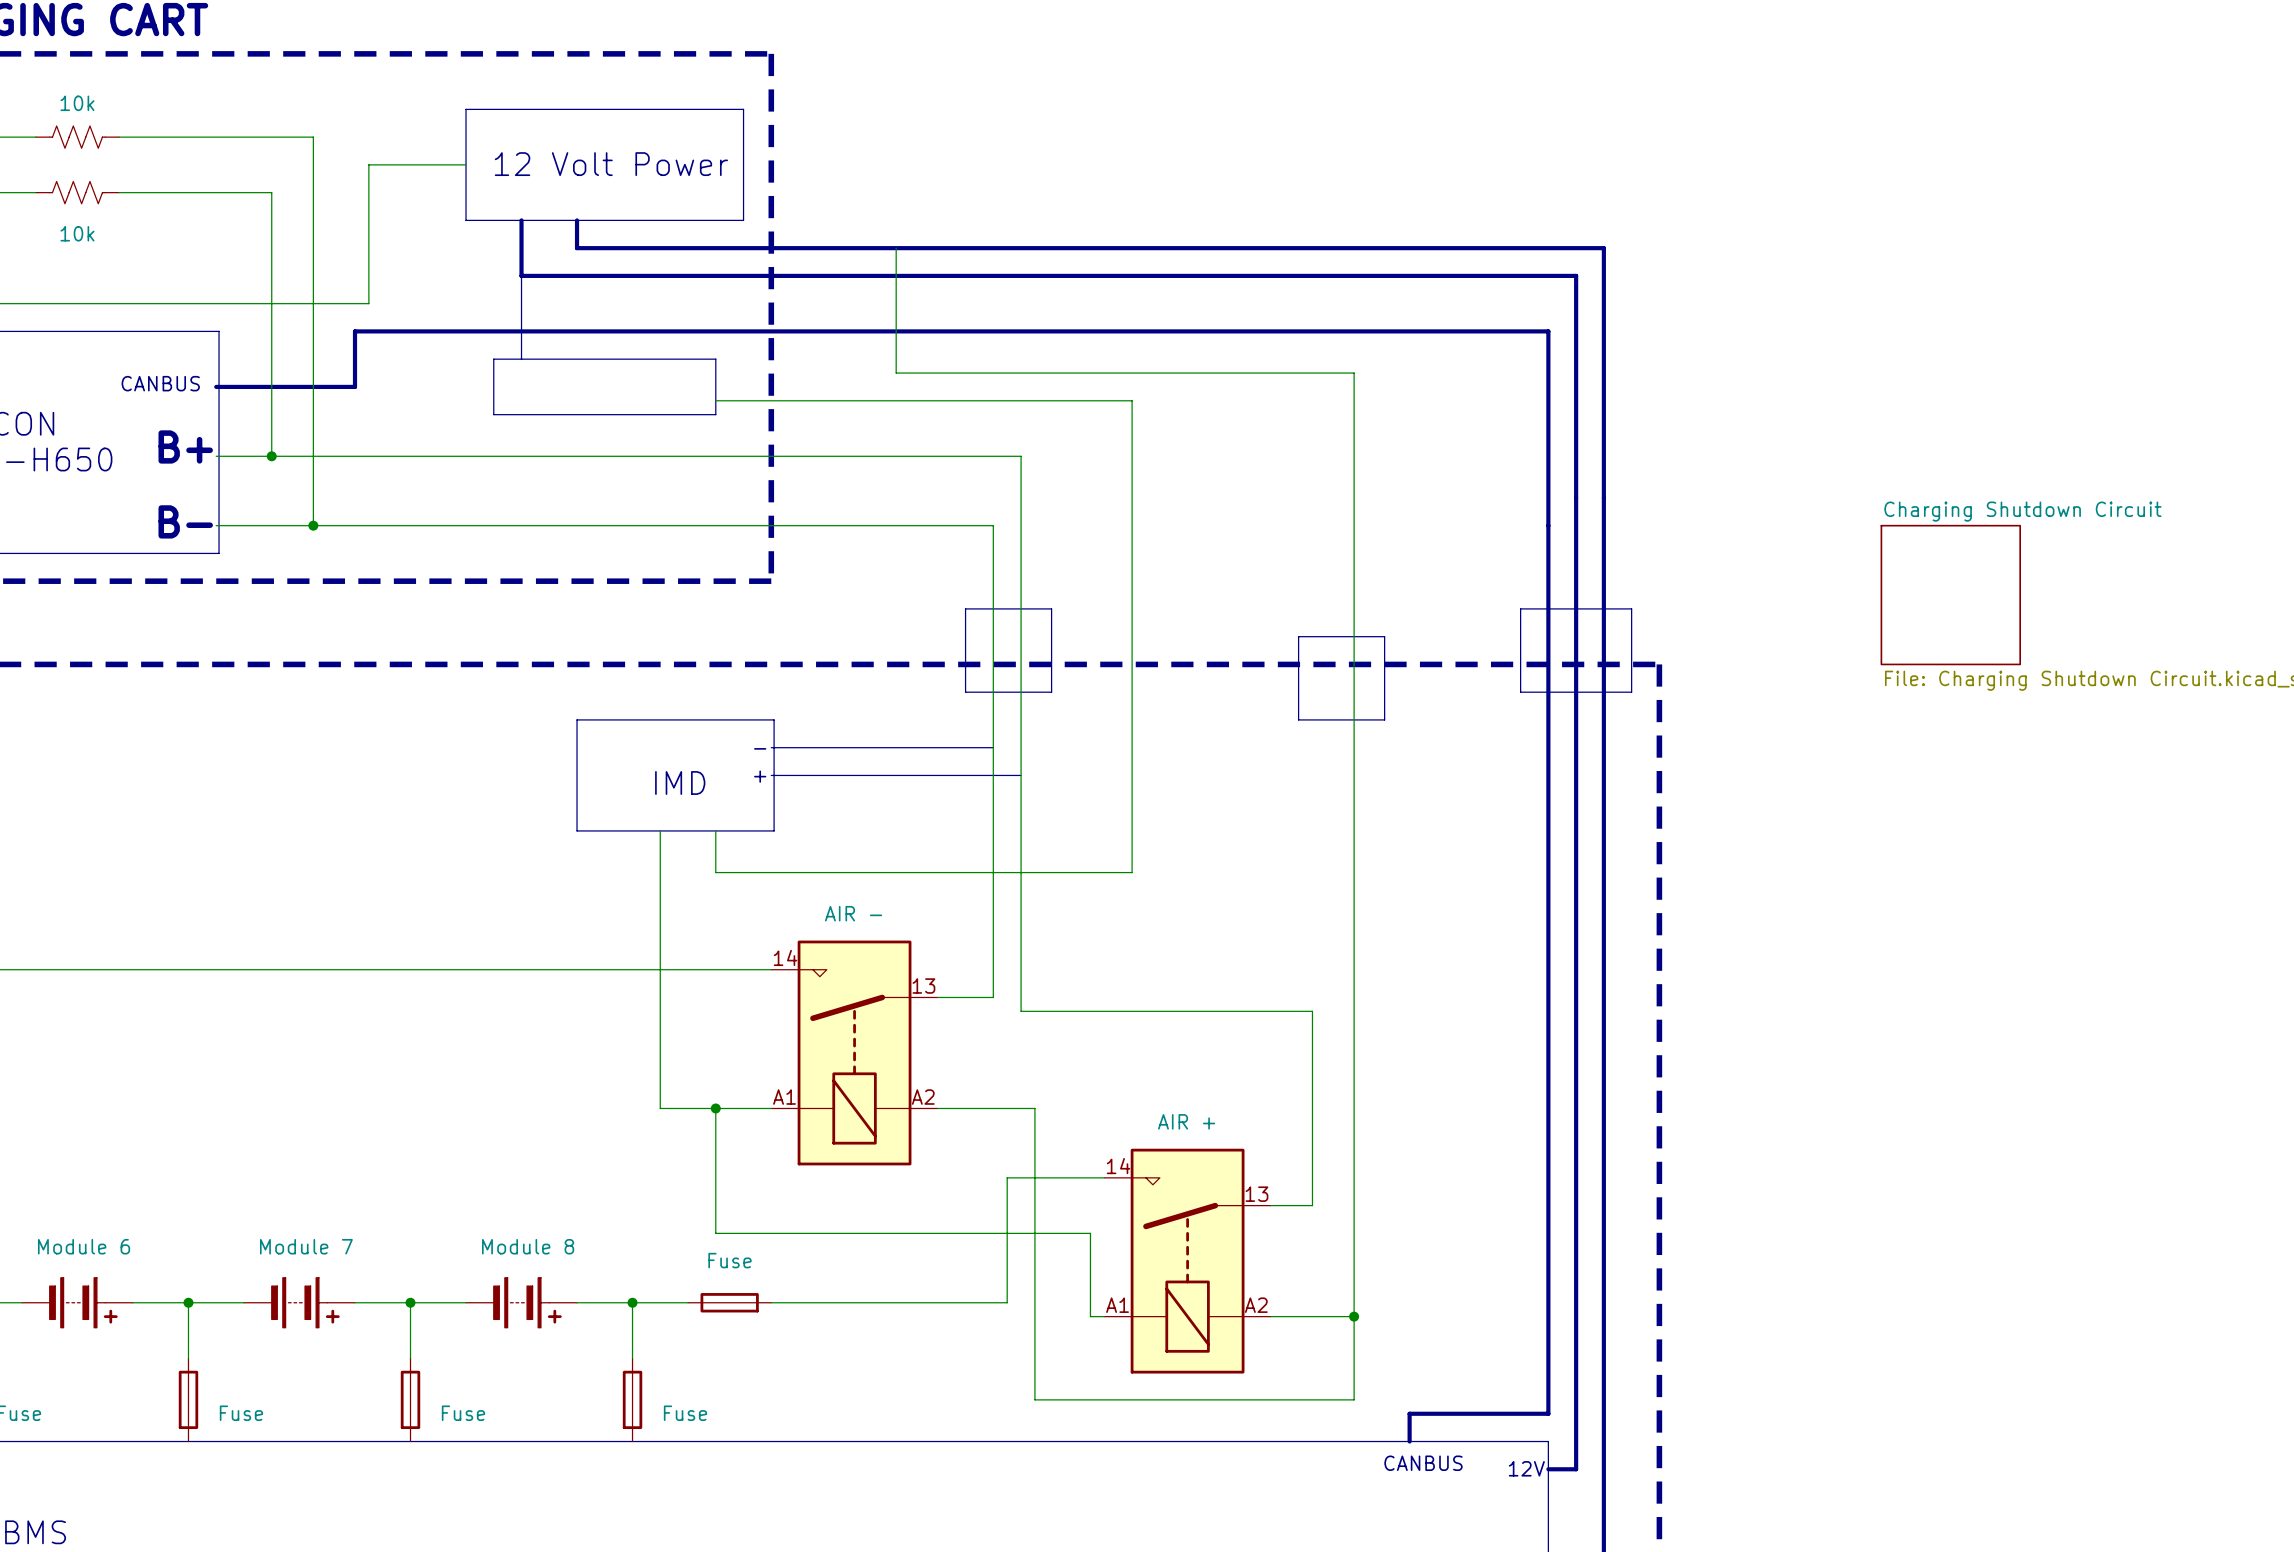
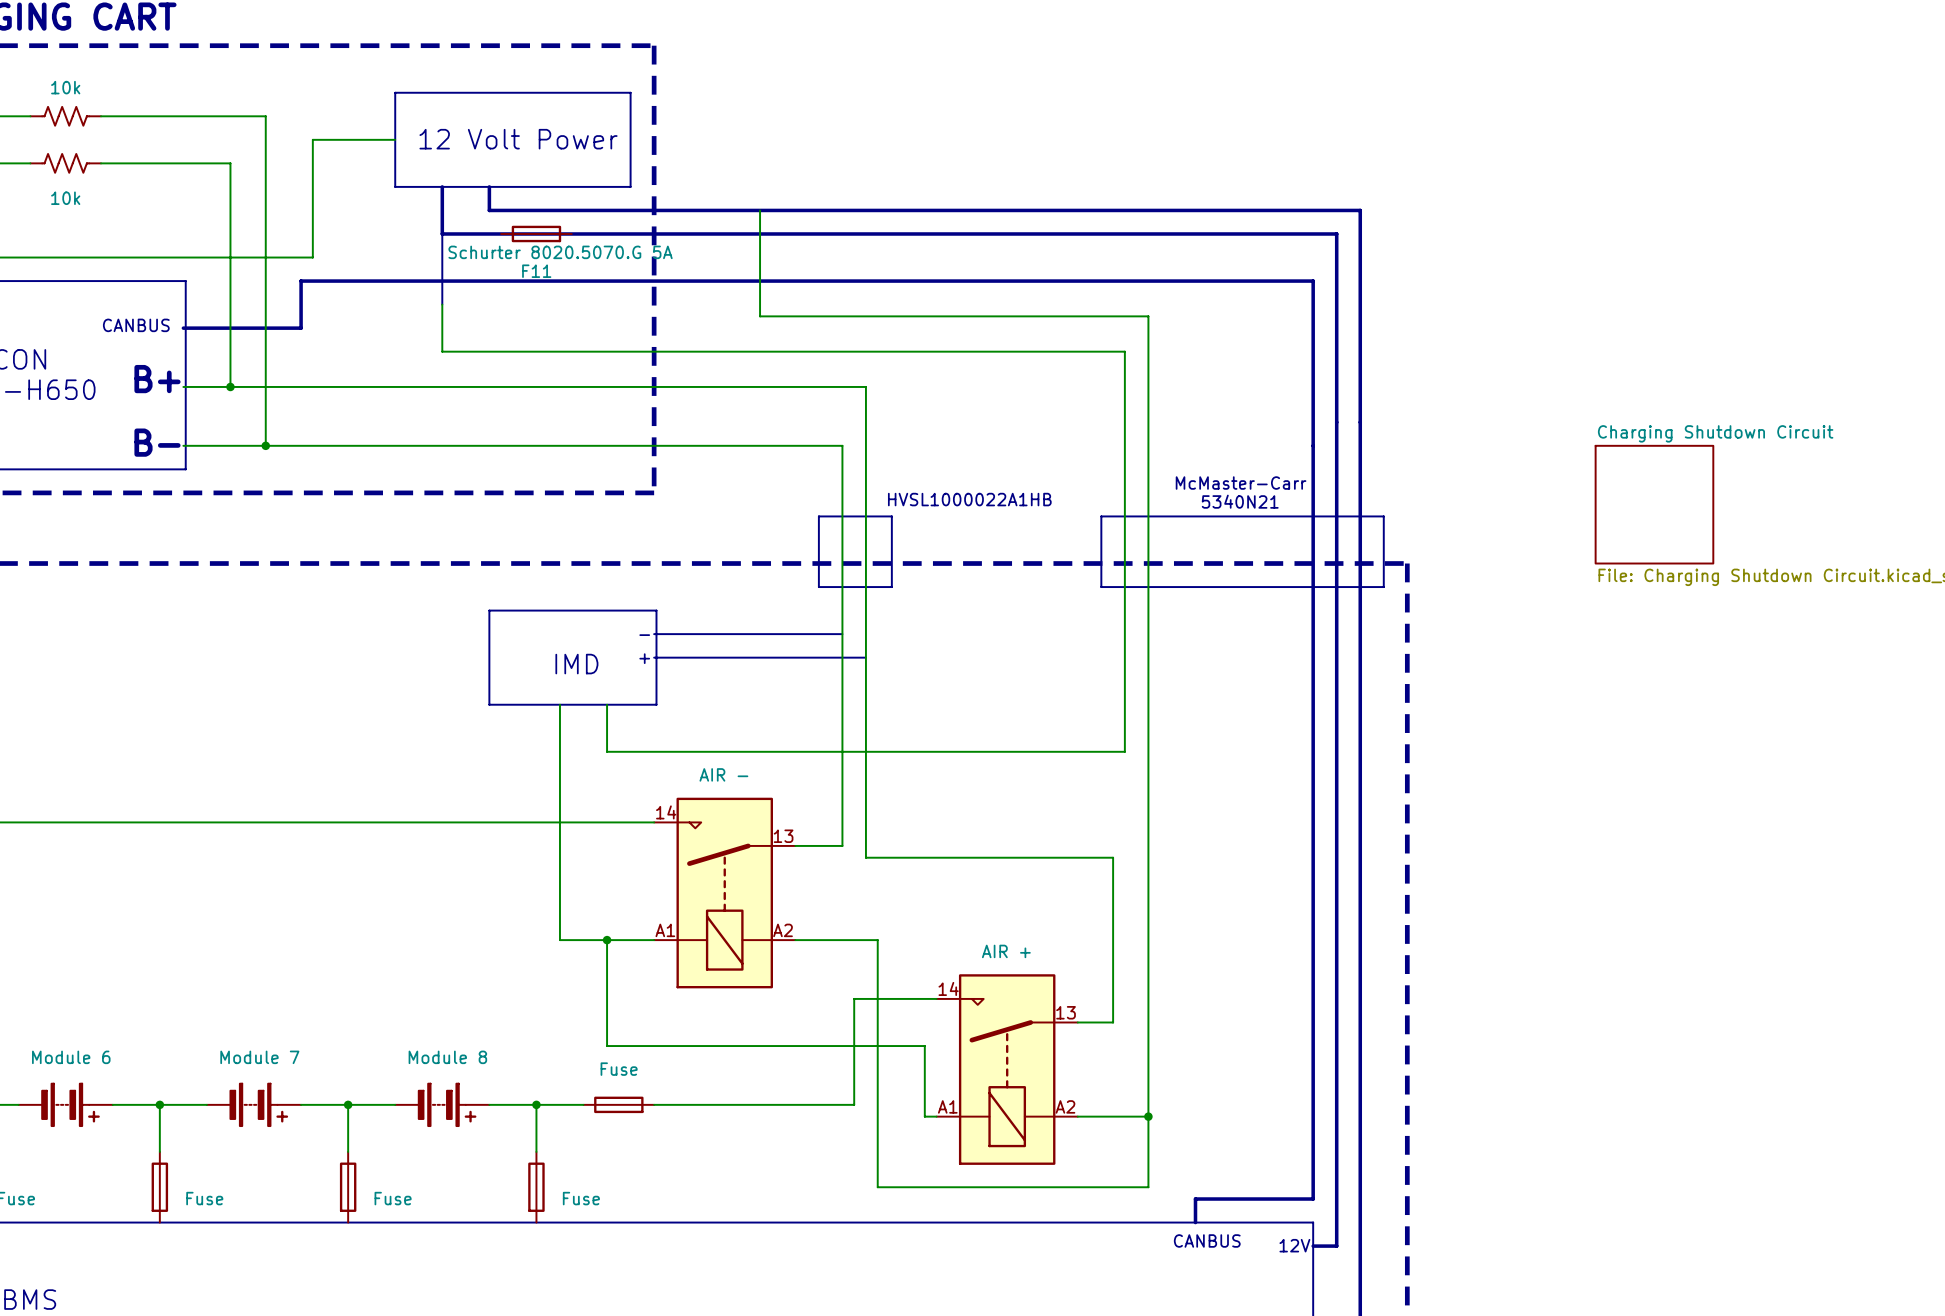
F11: none -> Schurter 8020.5070.G 5A (536, 233)
line: (493, 359) (715, 359) (715, 414) (493, 414) (493, 359) -> none
wire: (715, 400) (1132, 400) (1132, 872) (715, 872) -> (442, 304) (442, 351) (1124, 351) (1124, 751) (607, 751) (607, 740)
text: none -> McMaster-Carr (1241, 483)
text: none -> HVSL1000022A1HB (969, 499)
text: none -> 5340N21 (1240, 501)
line: (1520, 608) (1520, 692) -> (1289, 516) (1101, 516) (1101, 539)
line: (1298, 636) (1384, 636) (1384, 719) (1298, 719) (1298, 692) -> (1289, 587) (1101, 587)

